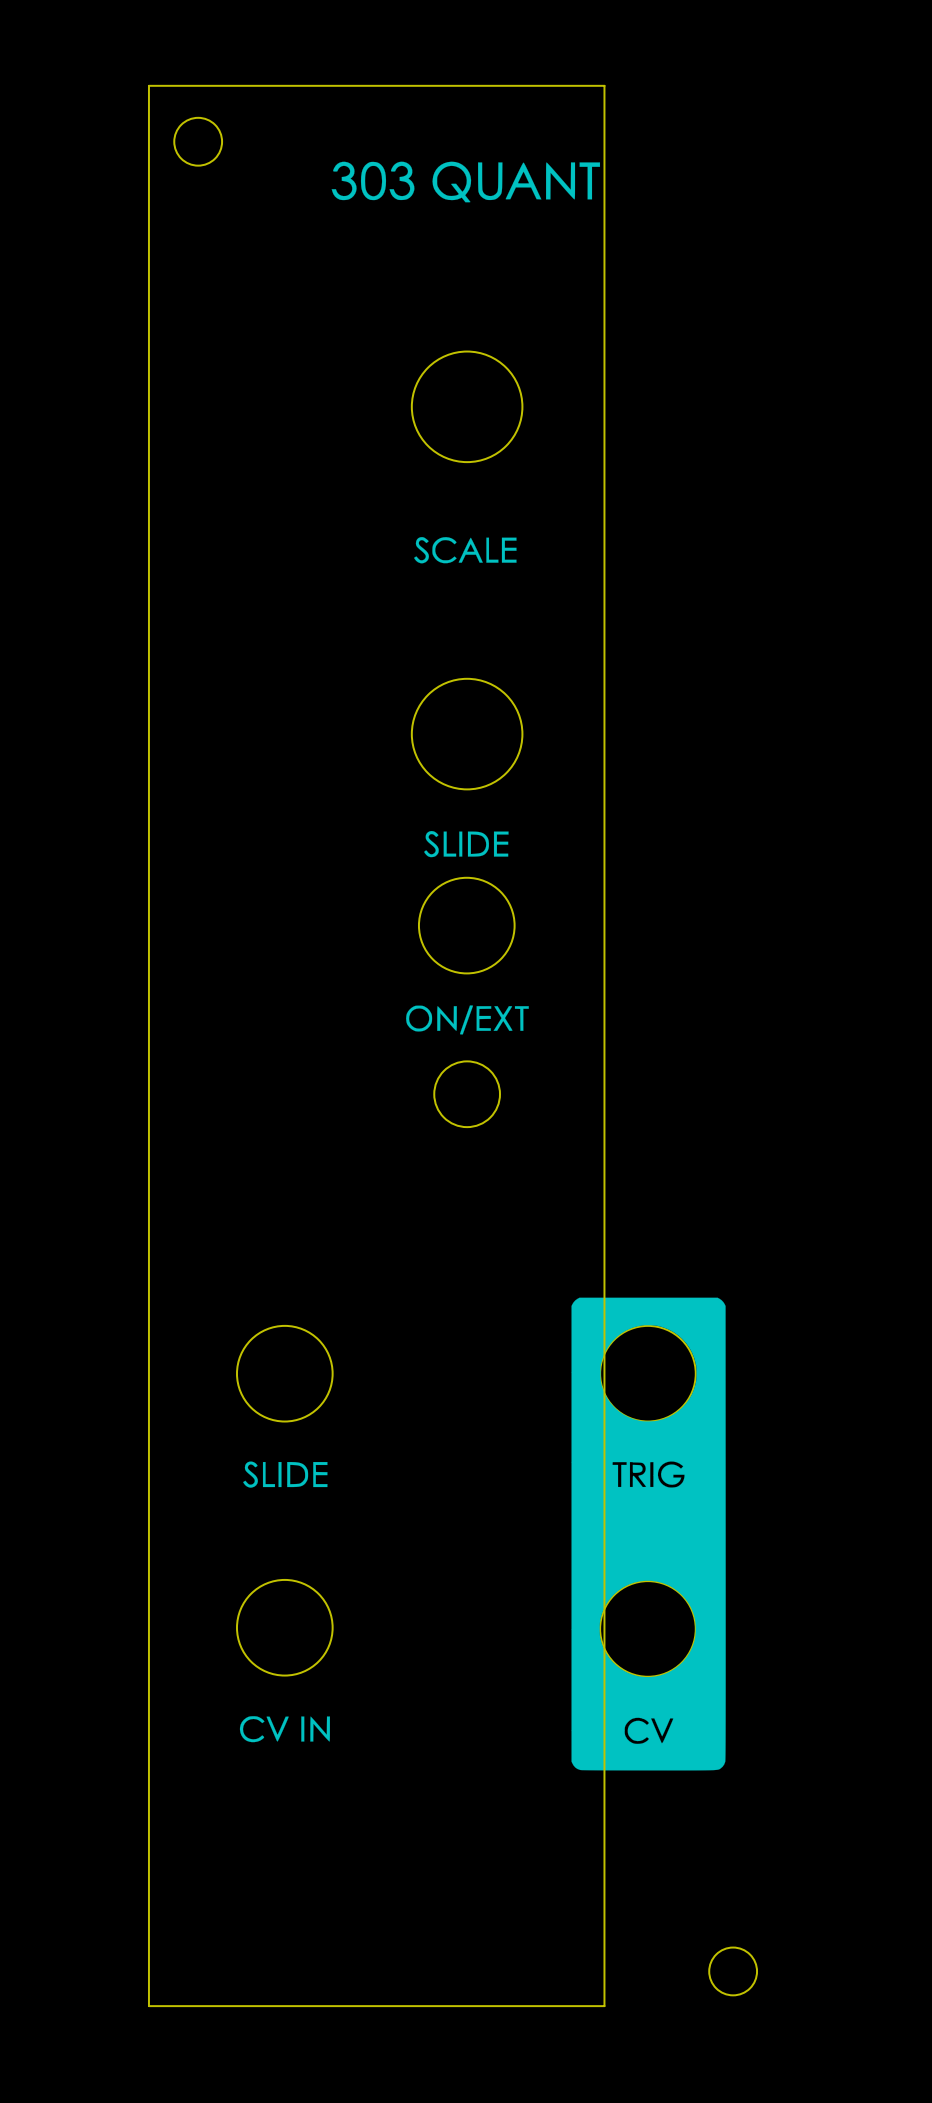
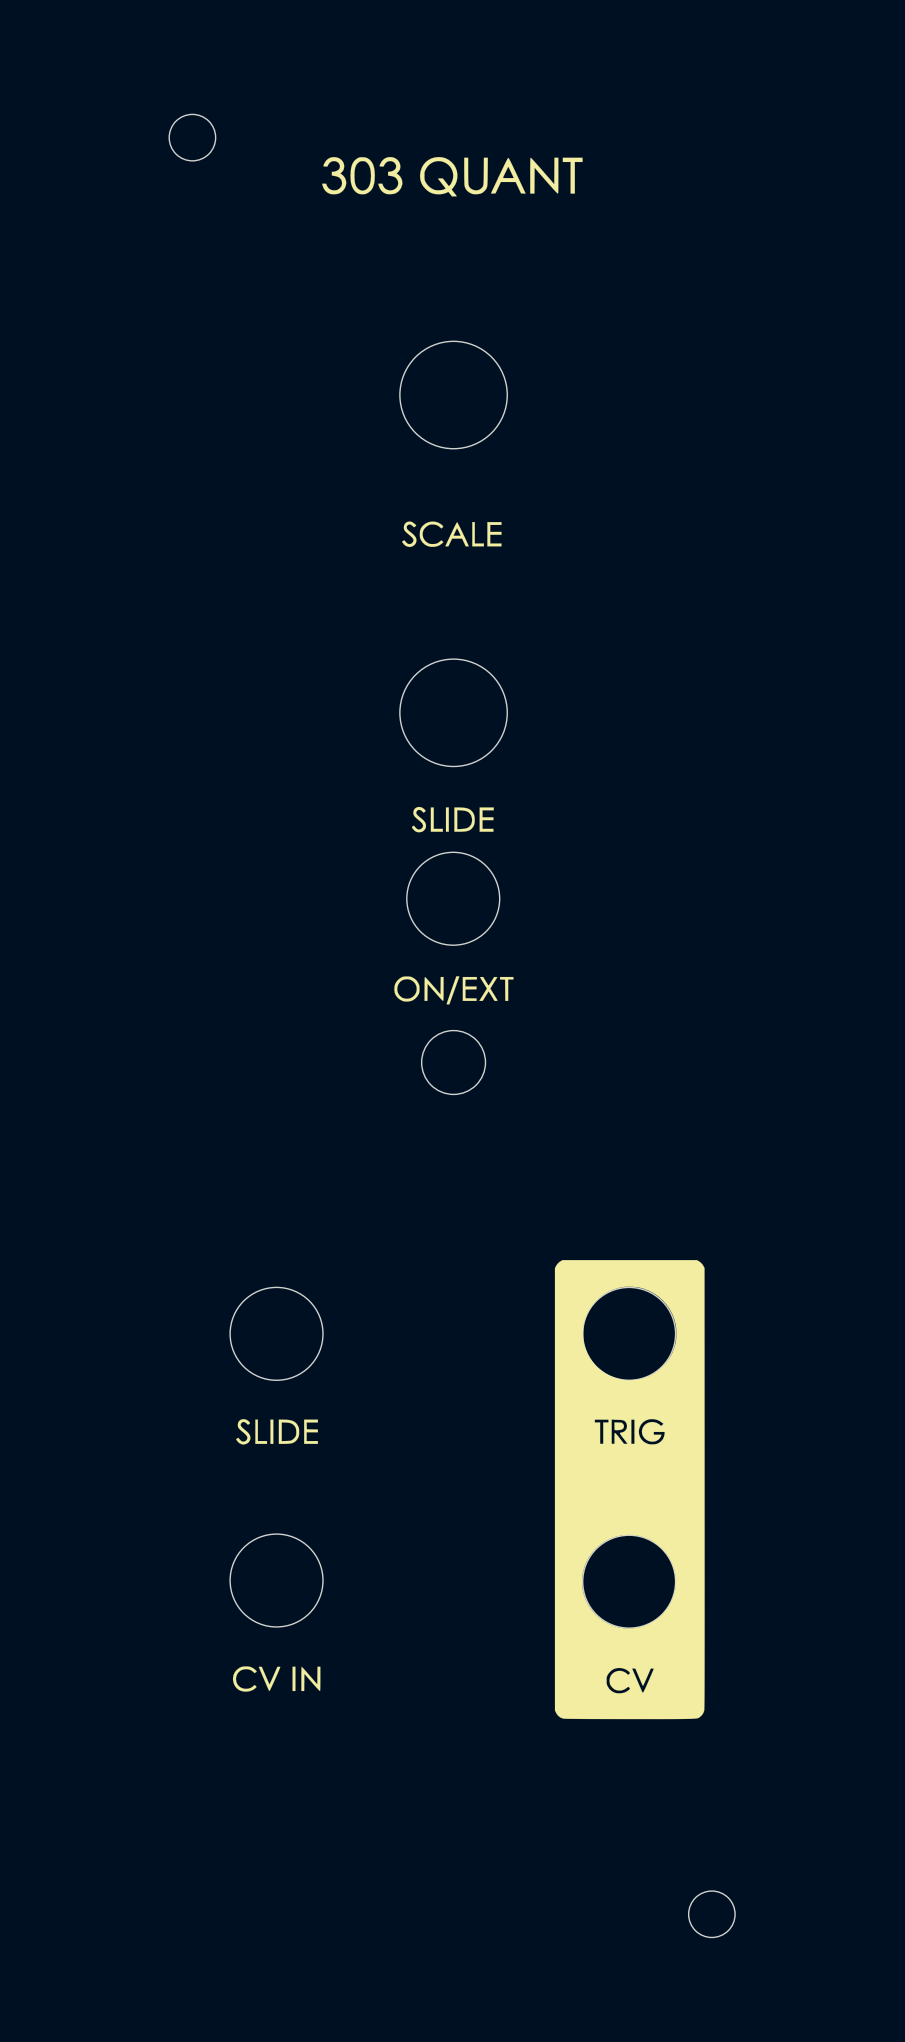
board edge: (148, 85) (604, 85) (604, 2006) (148, 2006) (148, 85) -> none

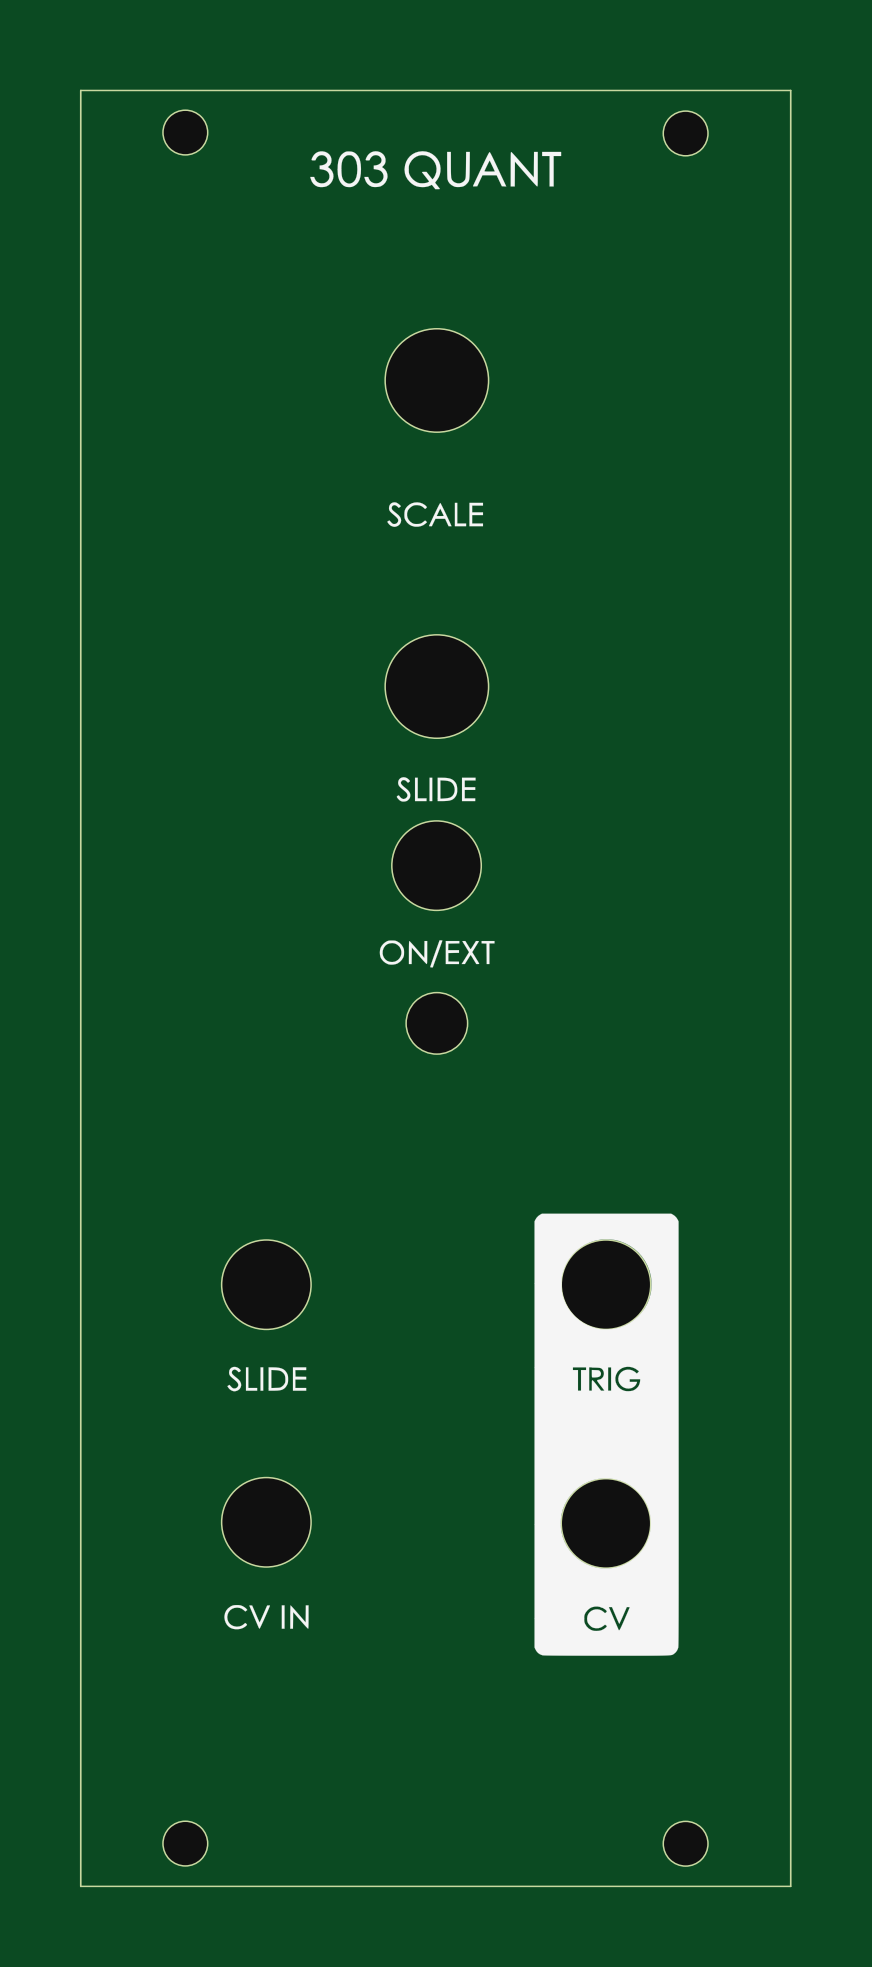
board edge: none -> (80, 90) (790, 90) (790, 1886) (80, 1886) (80, 90)
part: none -> (685, 133)
part: none -> (185, 1843)

